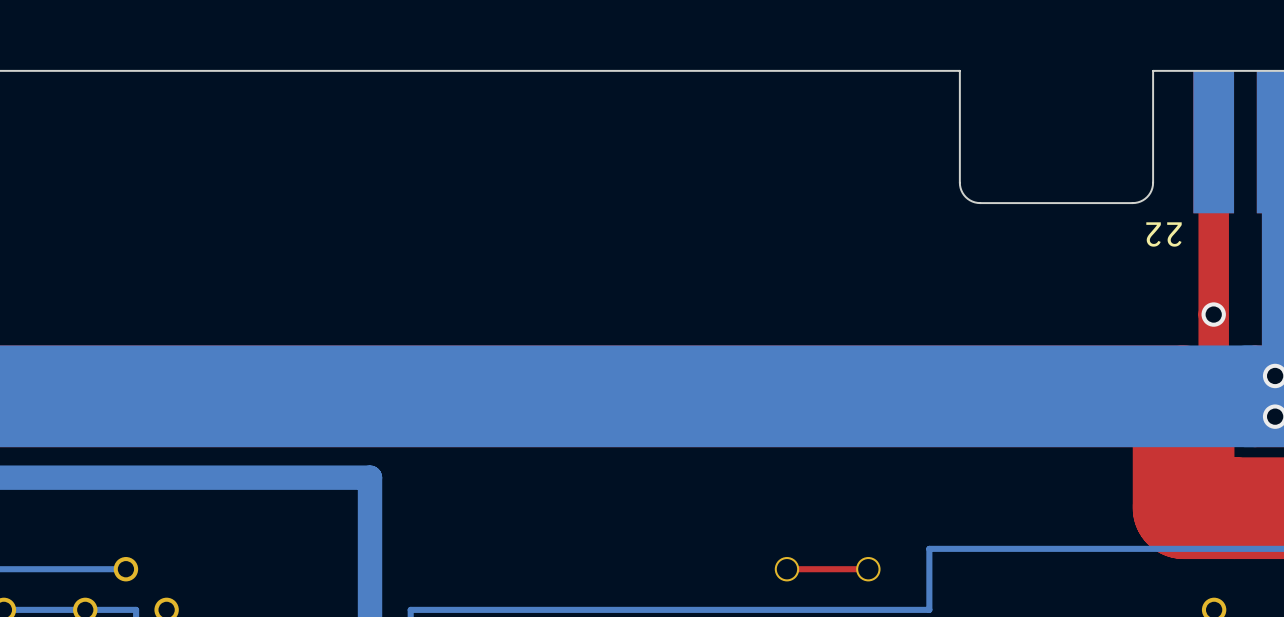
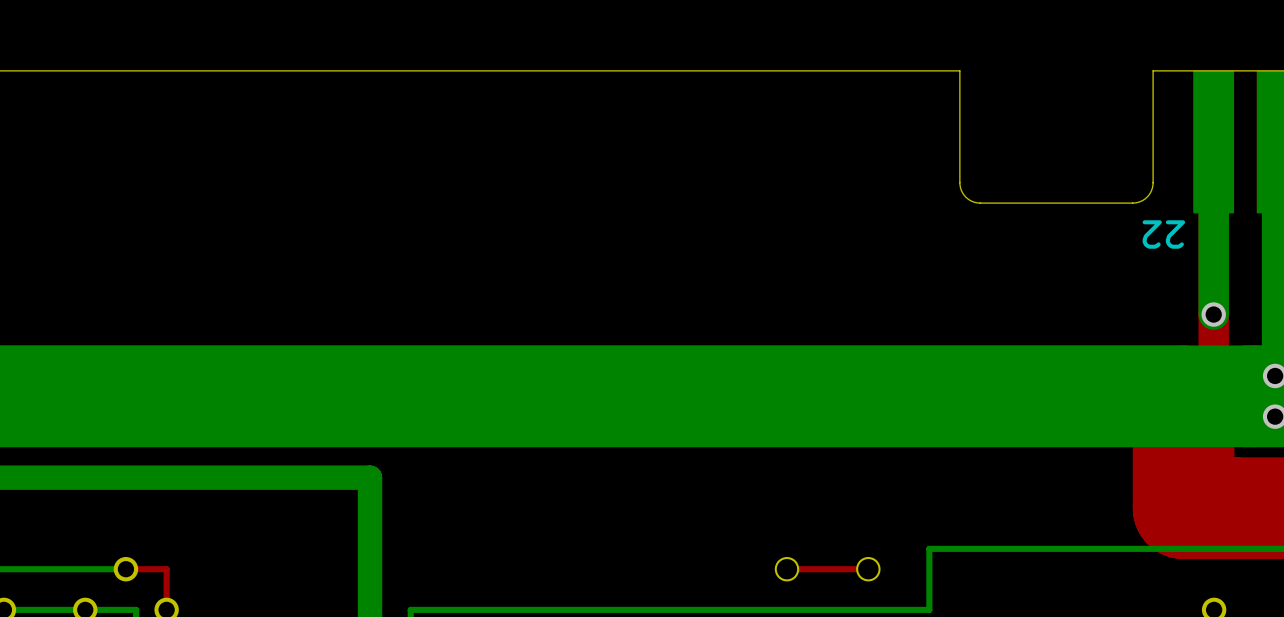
bottom track: none -> (1213, 142) (1213, 314)
top track: none -> (125, 569) (166, 569) (166, 609)

